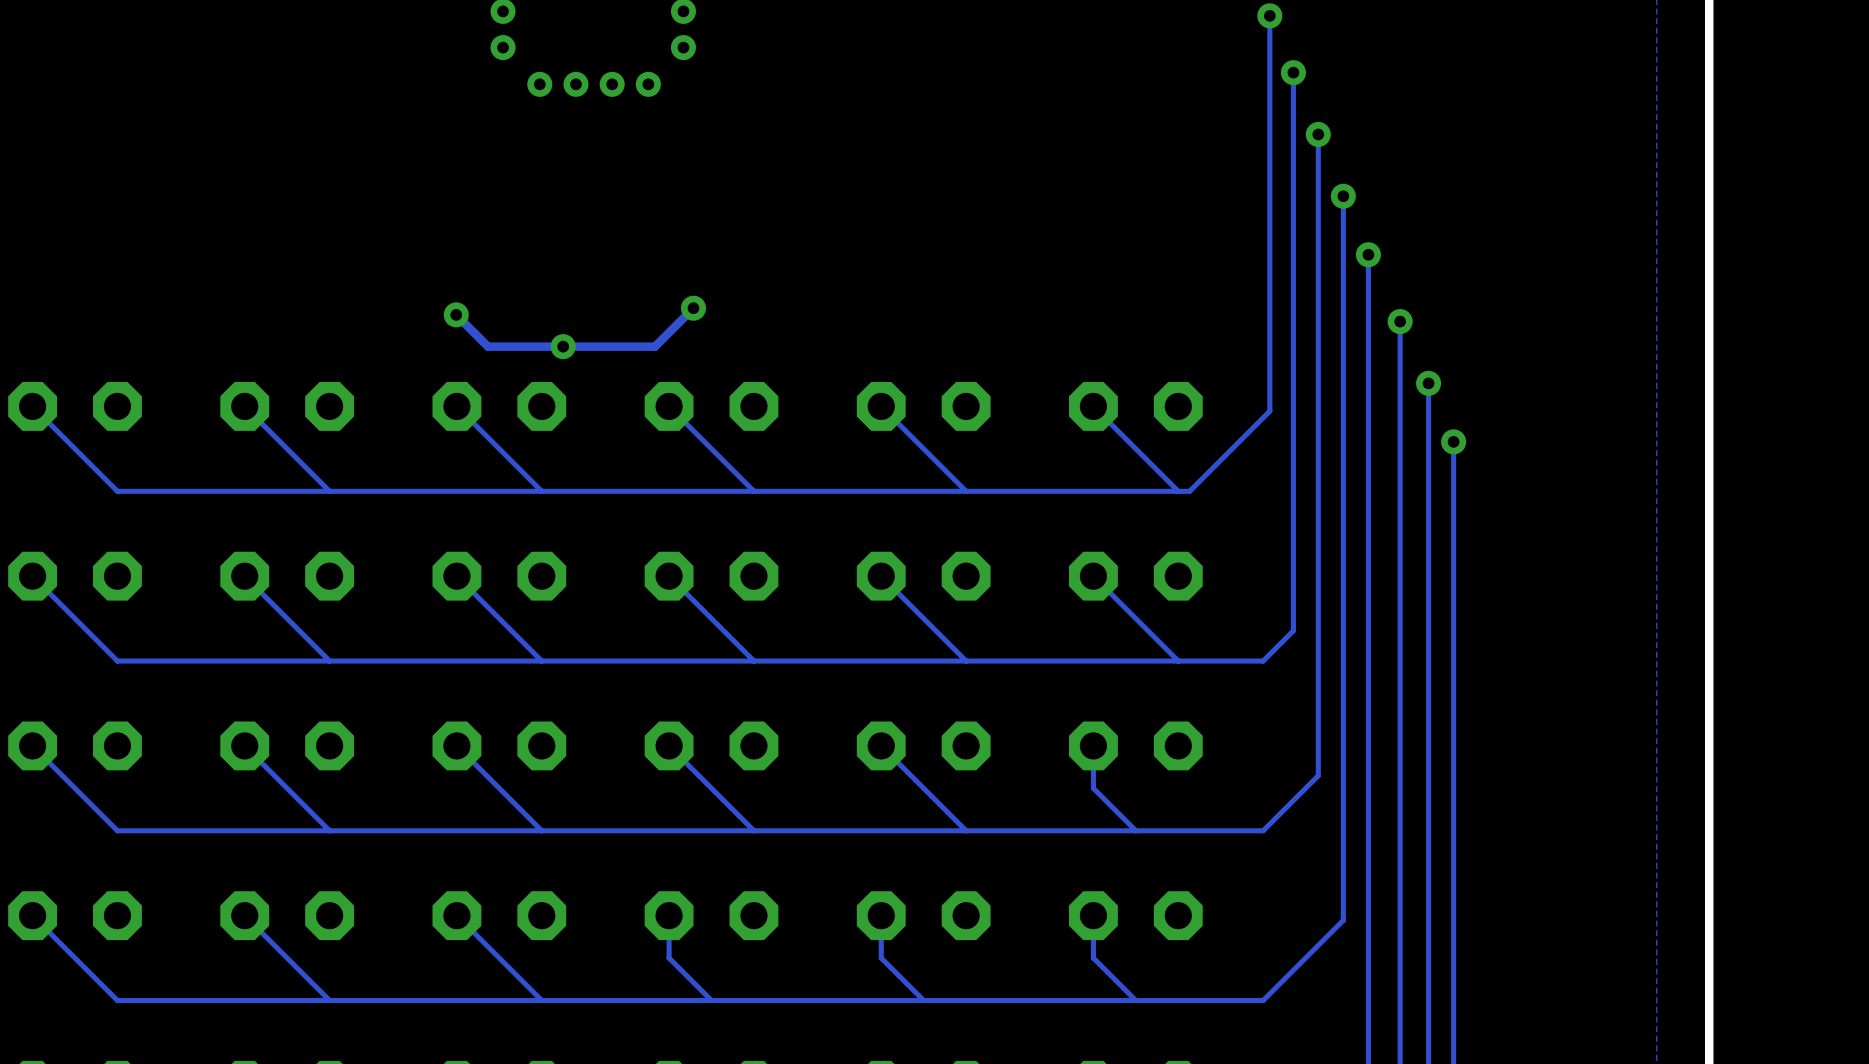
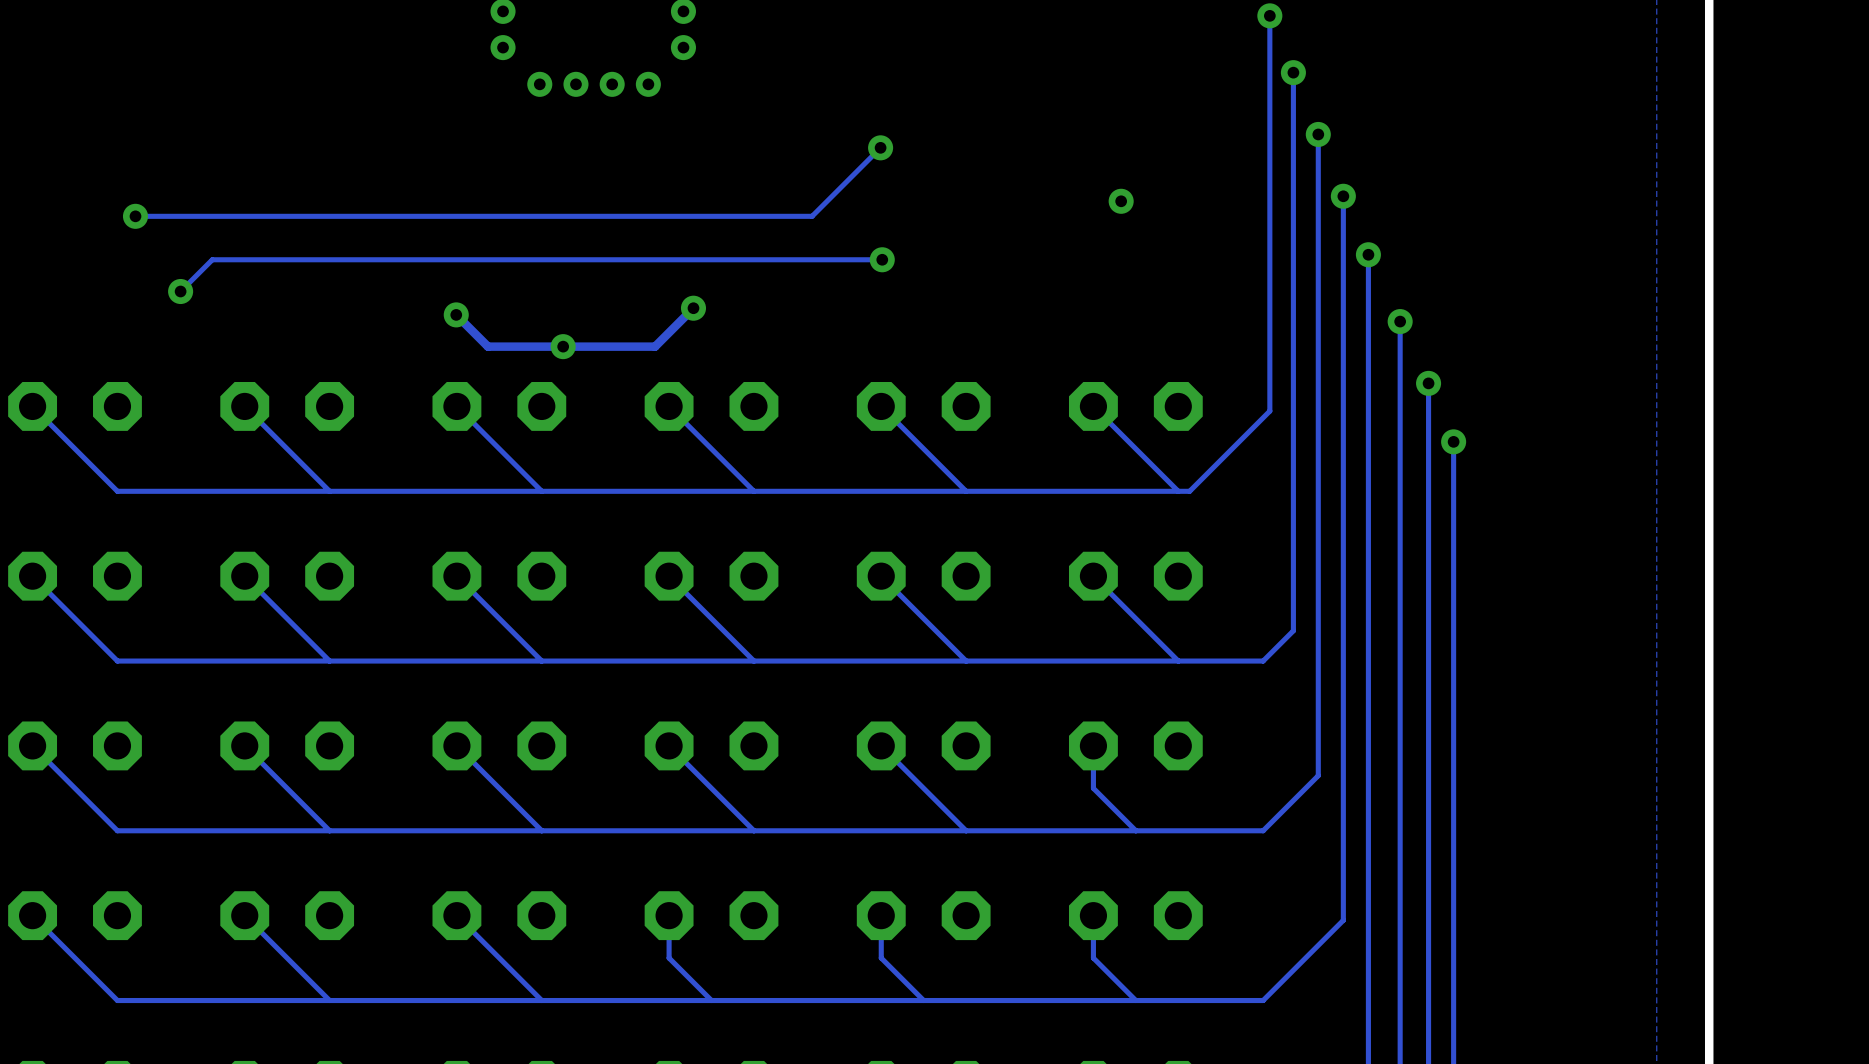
track: none -> (880, 147) (812, 216) (135, 216)
via: none -> (880, 147)
via: none -> (1121, 201)
via: none -> (135, 216)
track: none -> (882, 259) (212, 259) (180, 291)
via: none -> (882, 259)
via: none -> (180, 291)

